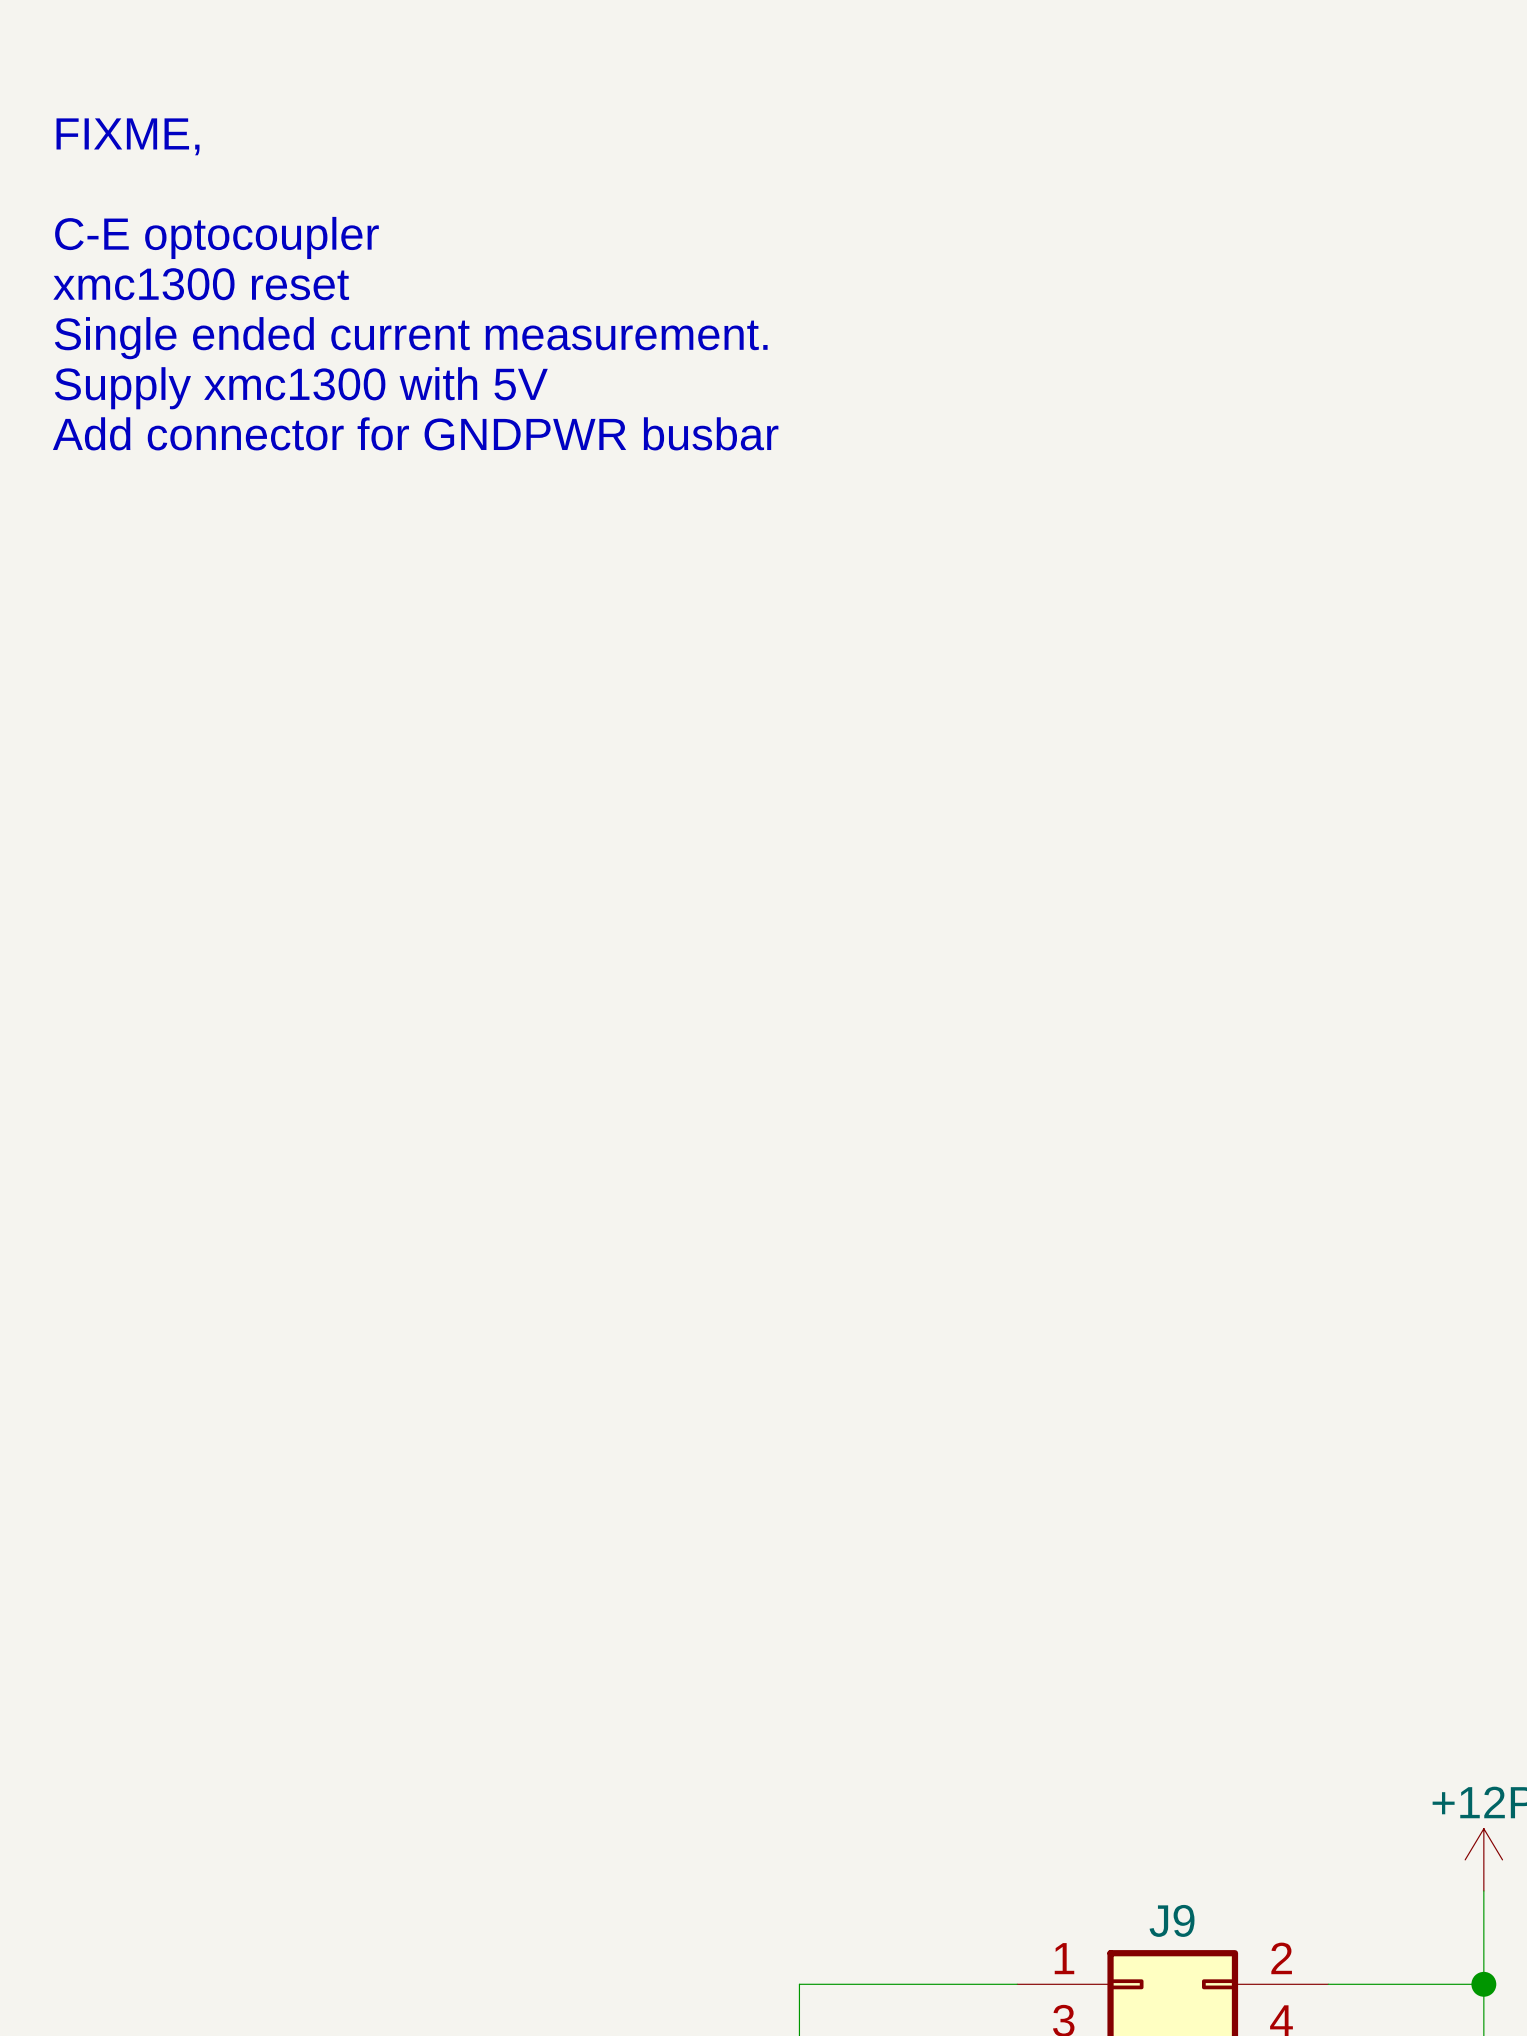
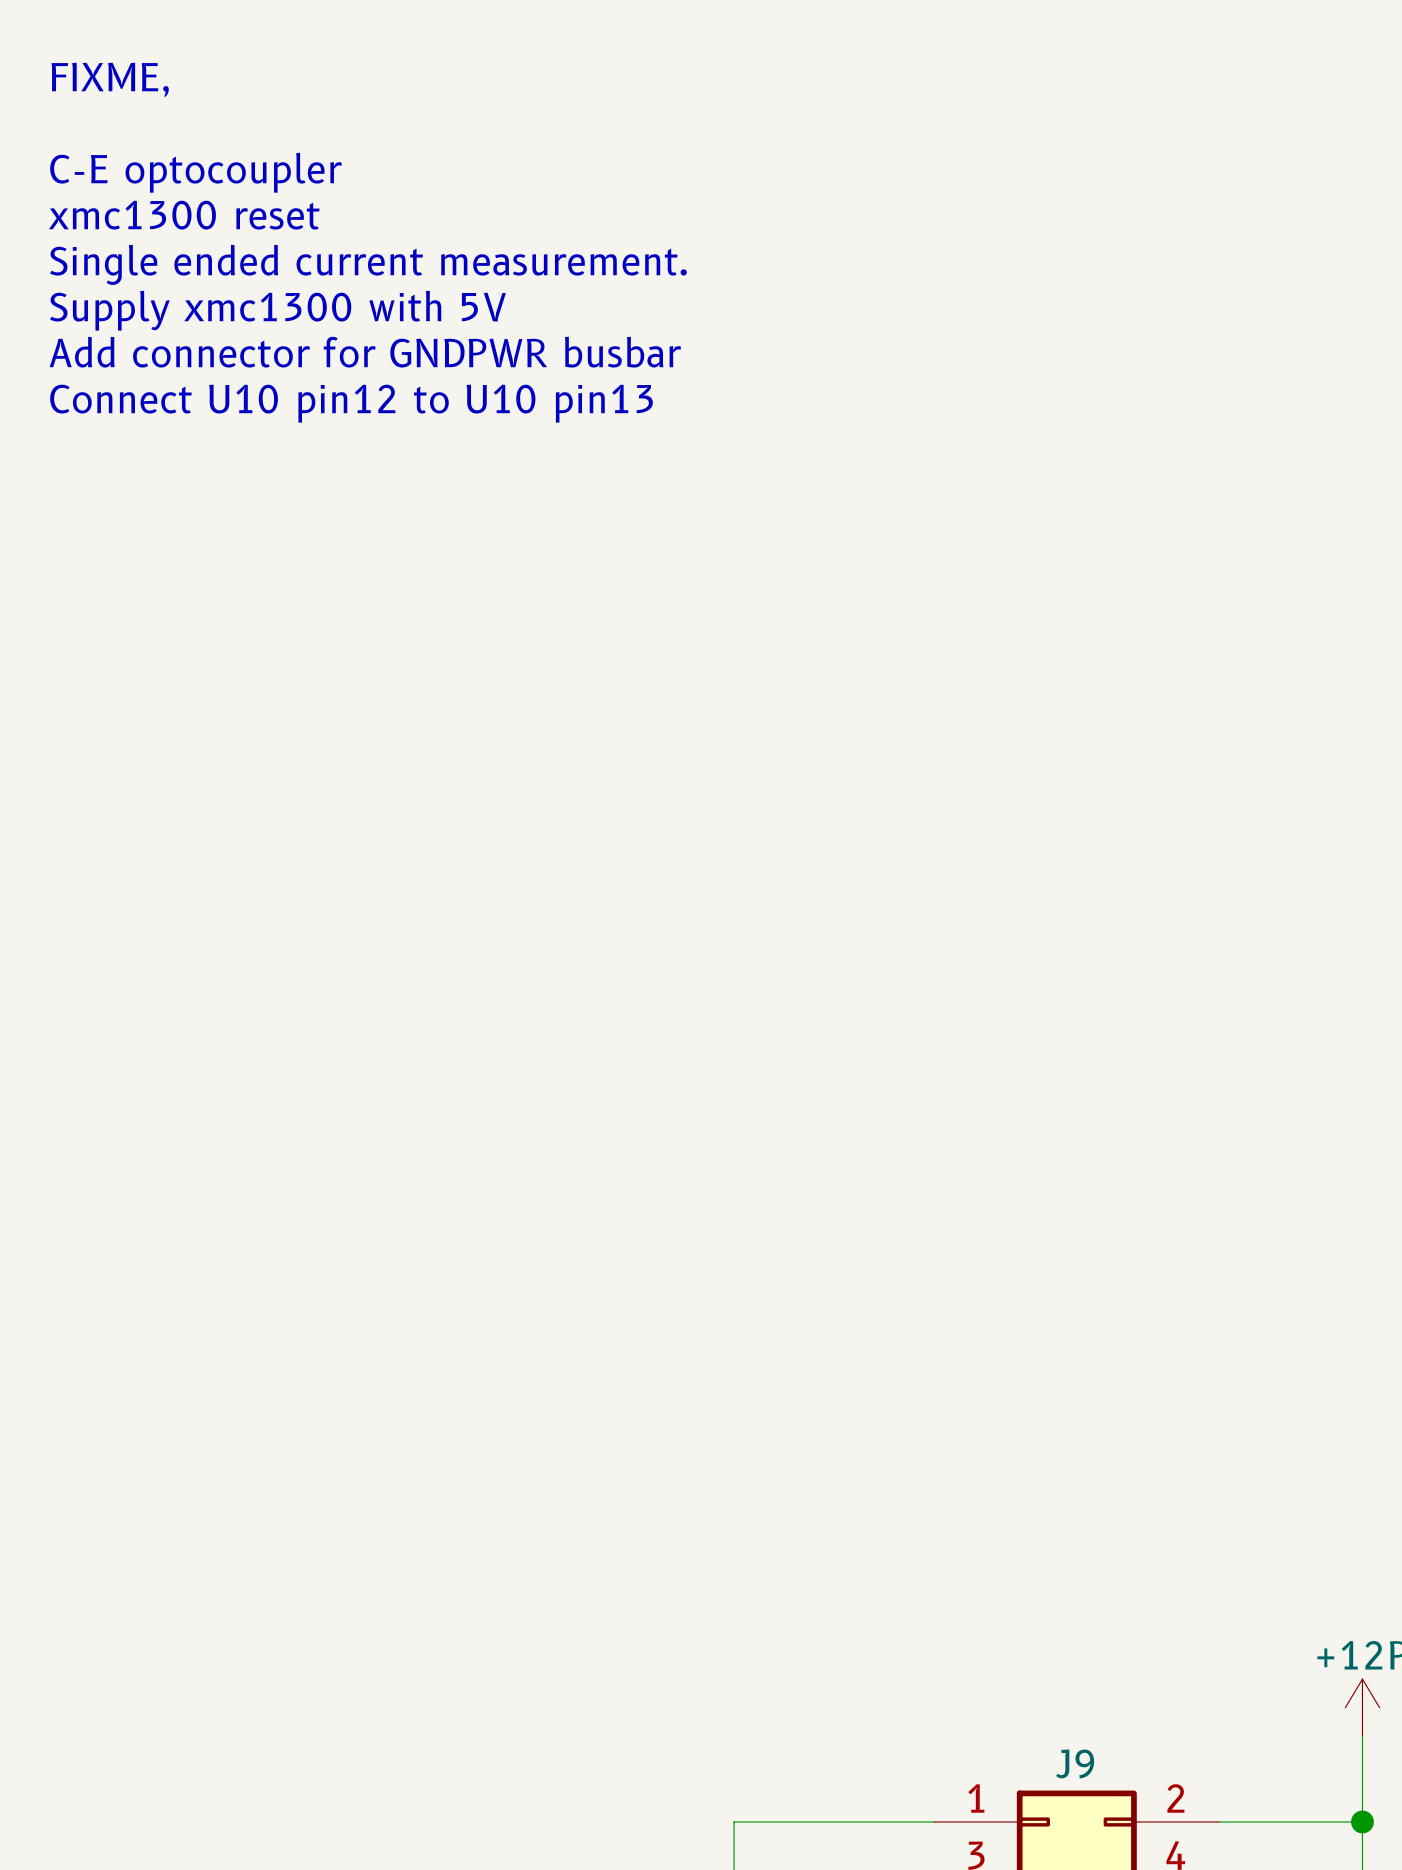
text position: FIXME, (128, 136) -> FIXME, (110, 79)
text: none -> C-E optocoupler (195, 172)
text: C-E optocoupler (216, 237) -> xmc1300 reset (184, 215)
text: xmc1300 reset (201, 284) -> Single ended current measurement. (368, 264)
text: Single ended current measurement. (411, 338) -> Supply xmc1300 with 5V (277, 310)
text: Supply xmc1300 with 5V (301, 388) -> Add connector for GNDPWR busbar (365, 352)
text: Add connector for GNDPWR busbar (415, 433) -> Connect U10 pin12 to U10 pin13 (351, 403)

